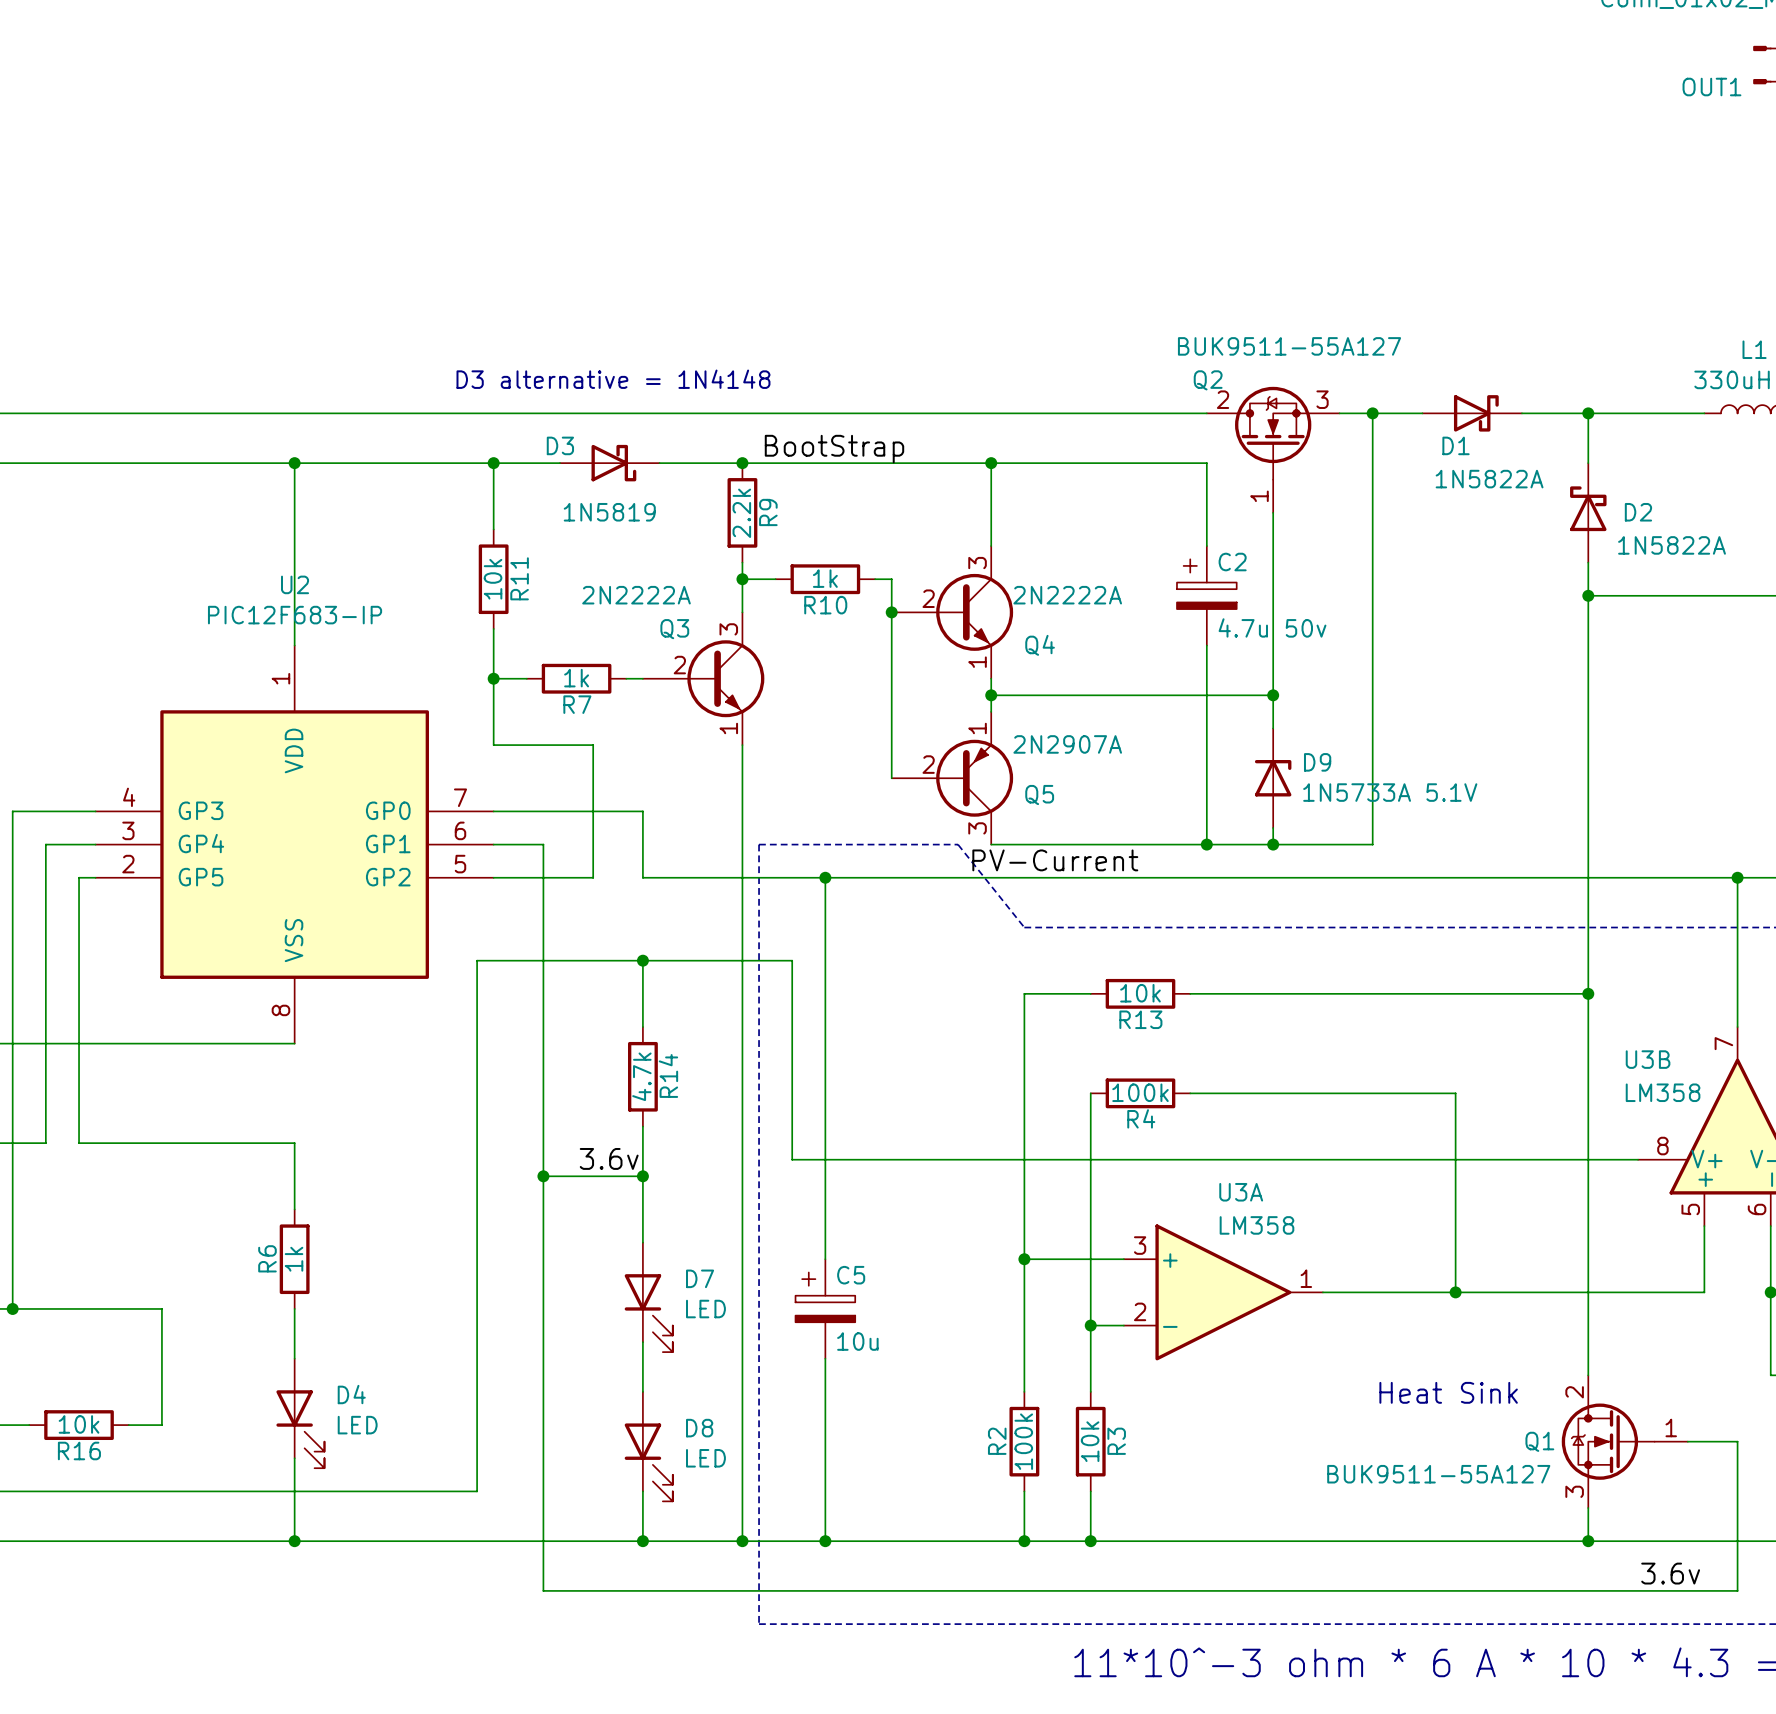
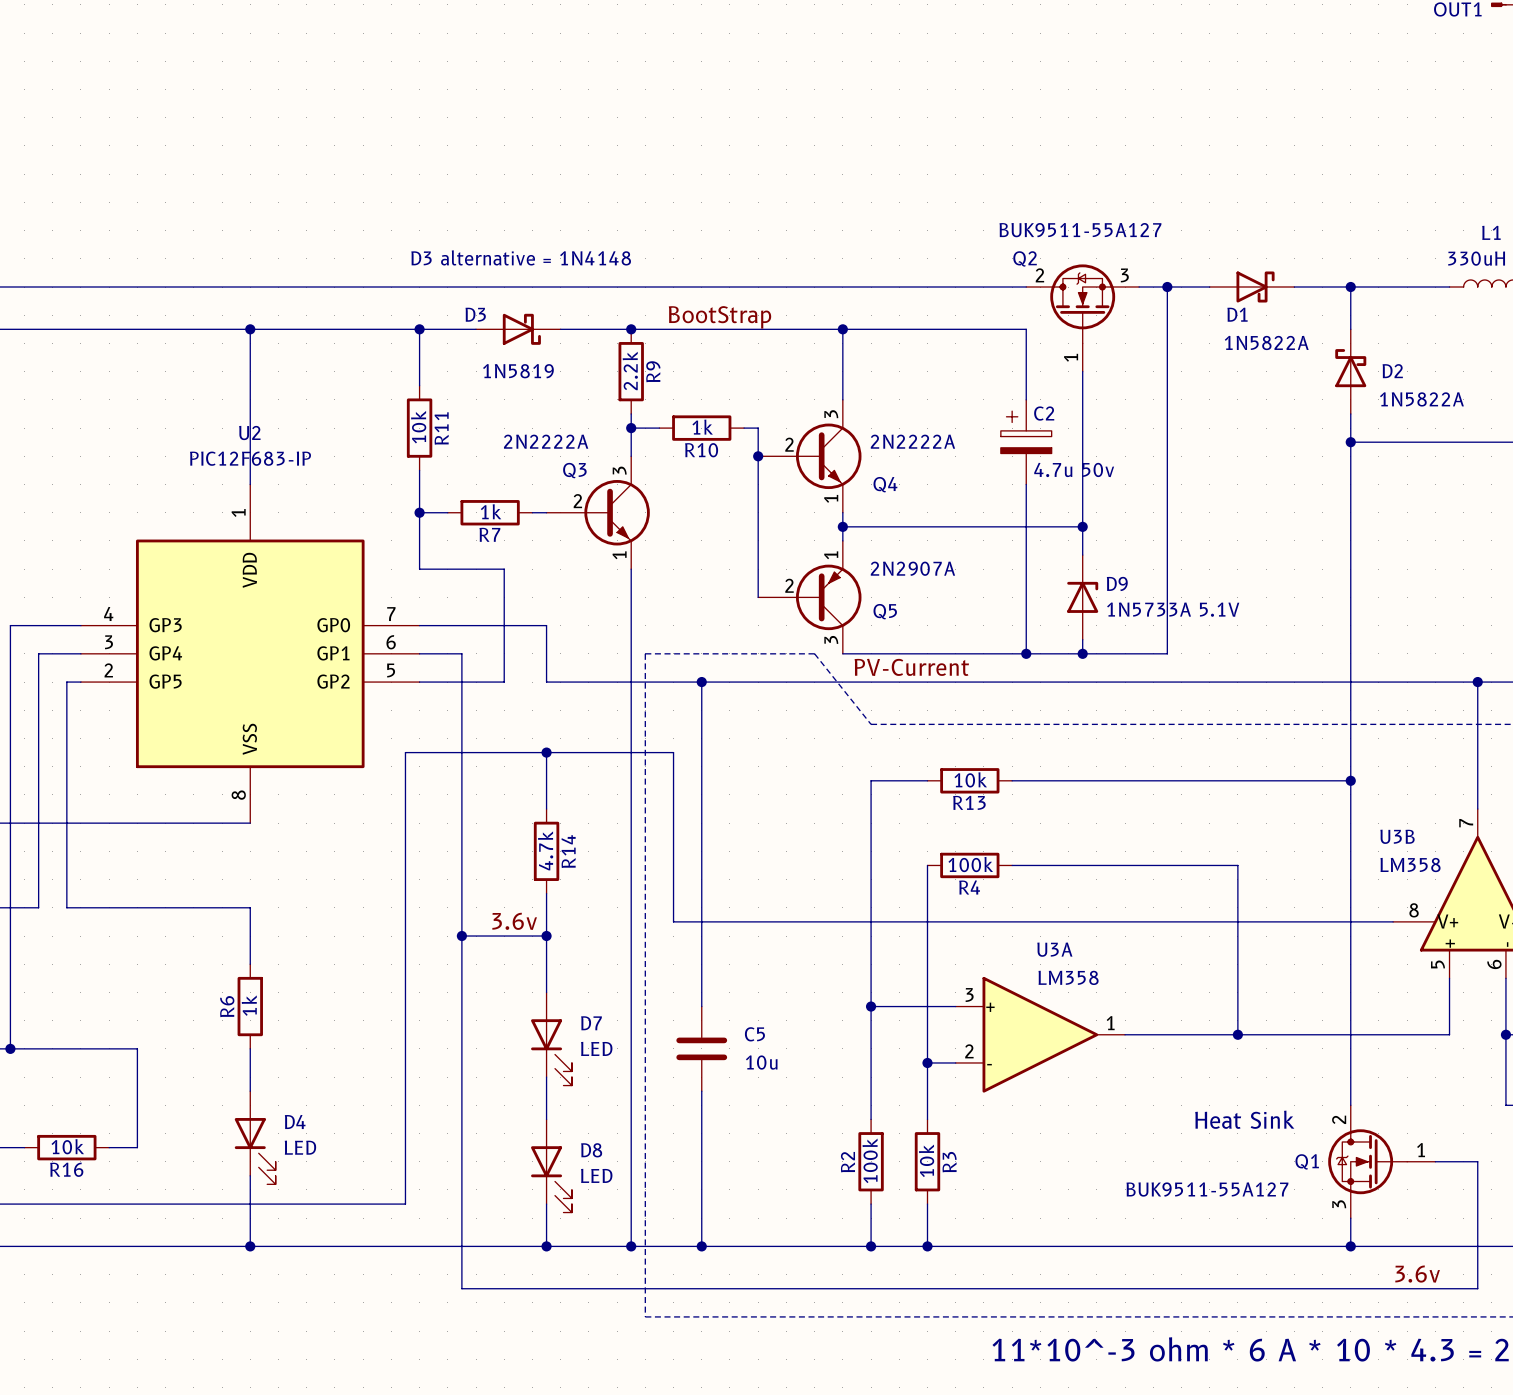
C5 symbol: [795, 1259, 856, 1359] -> [676, 1006, 728, 1092]
C5 name position: C5 (851, 1275) -> C5 (754, 1034)
C5 value position: 10u (857, 1341) -> 10u (761, 1062)

